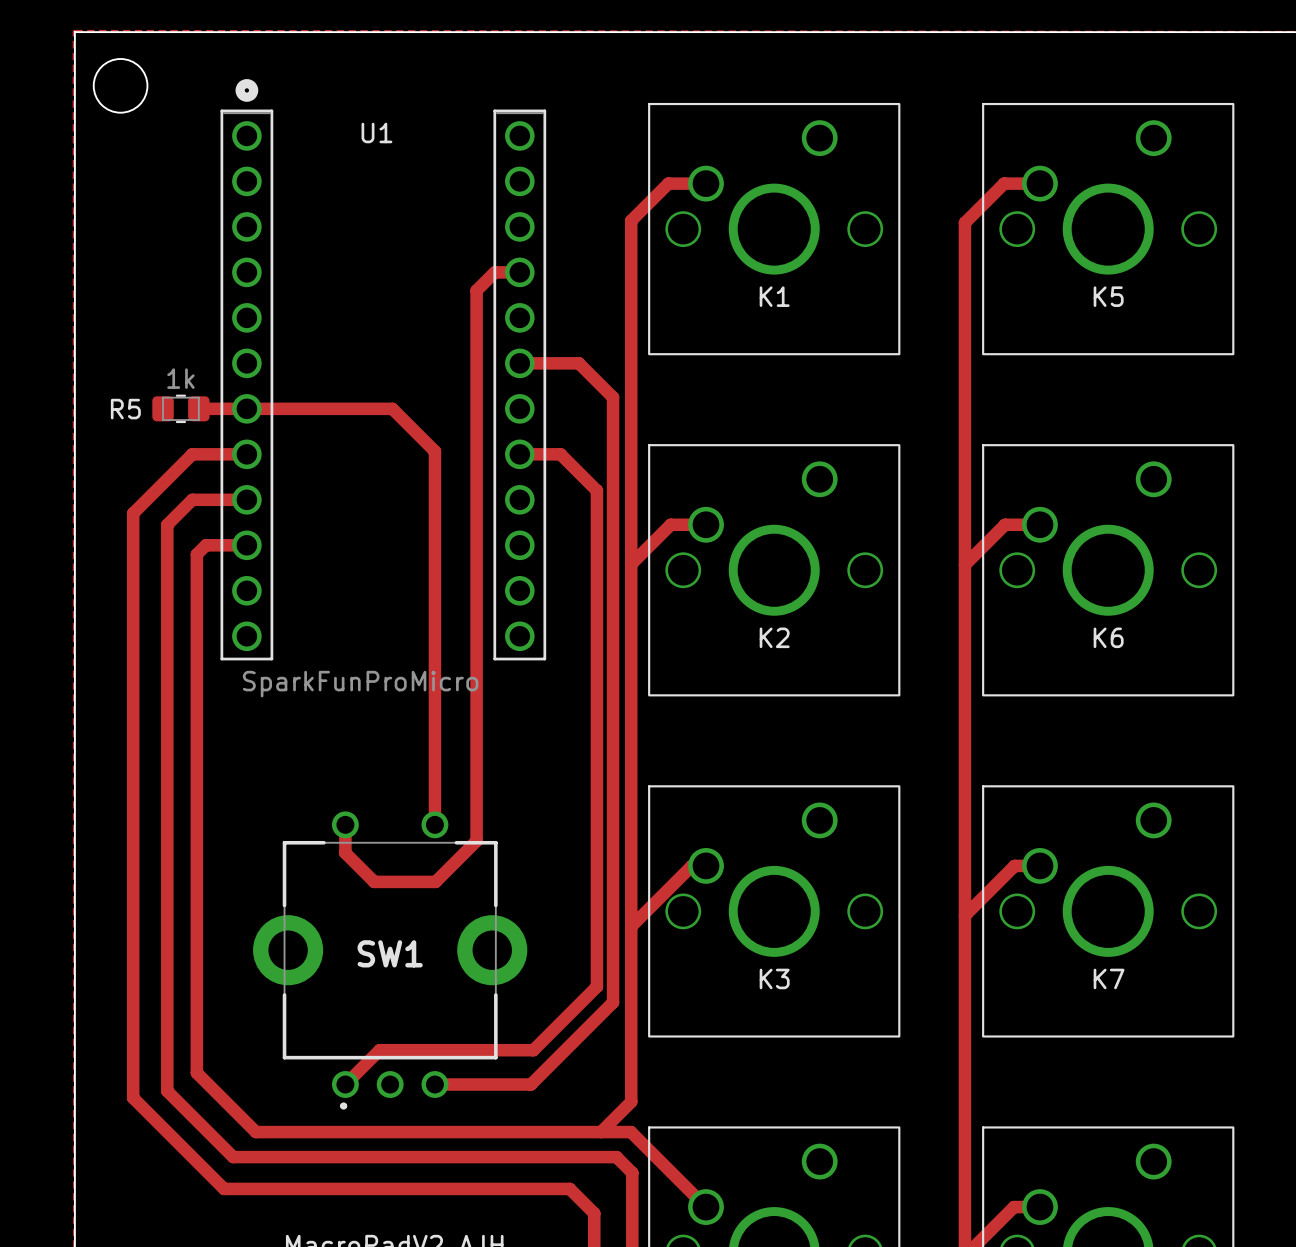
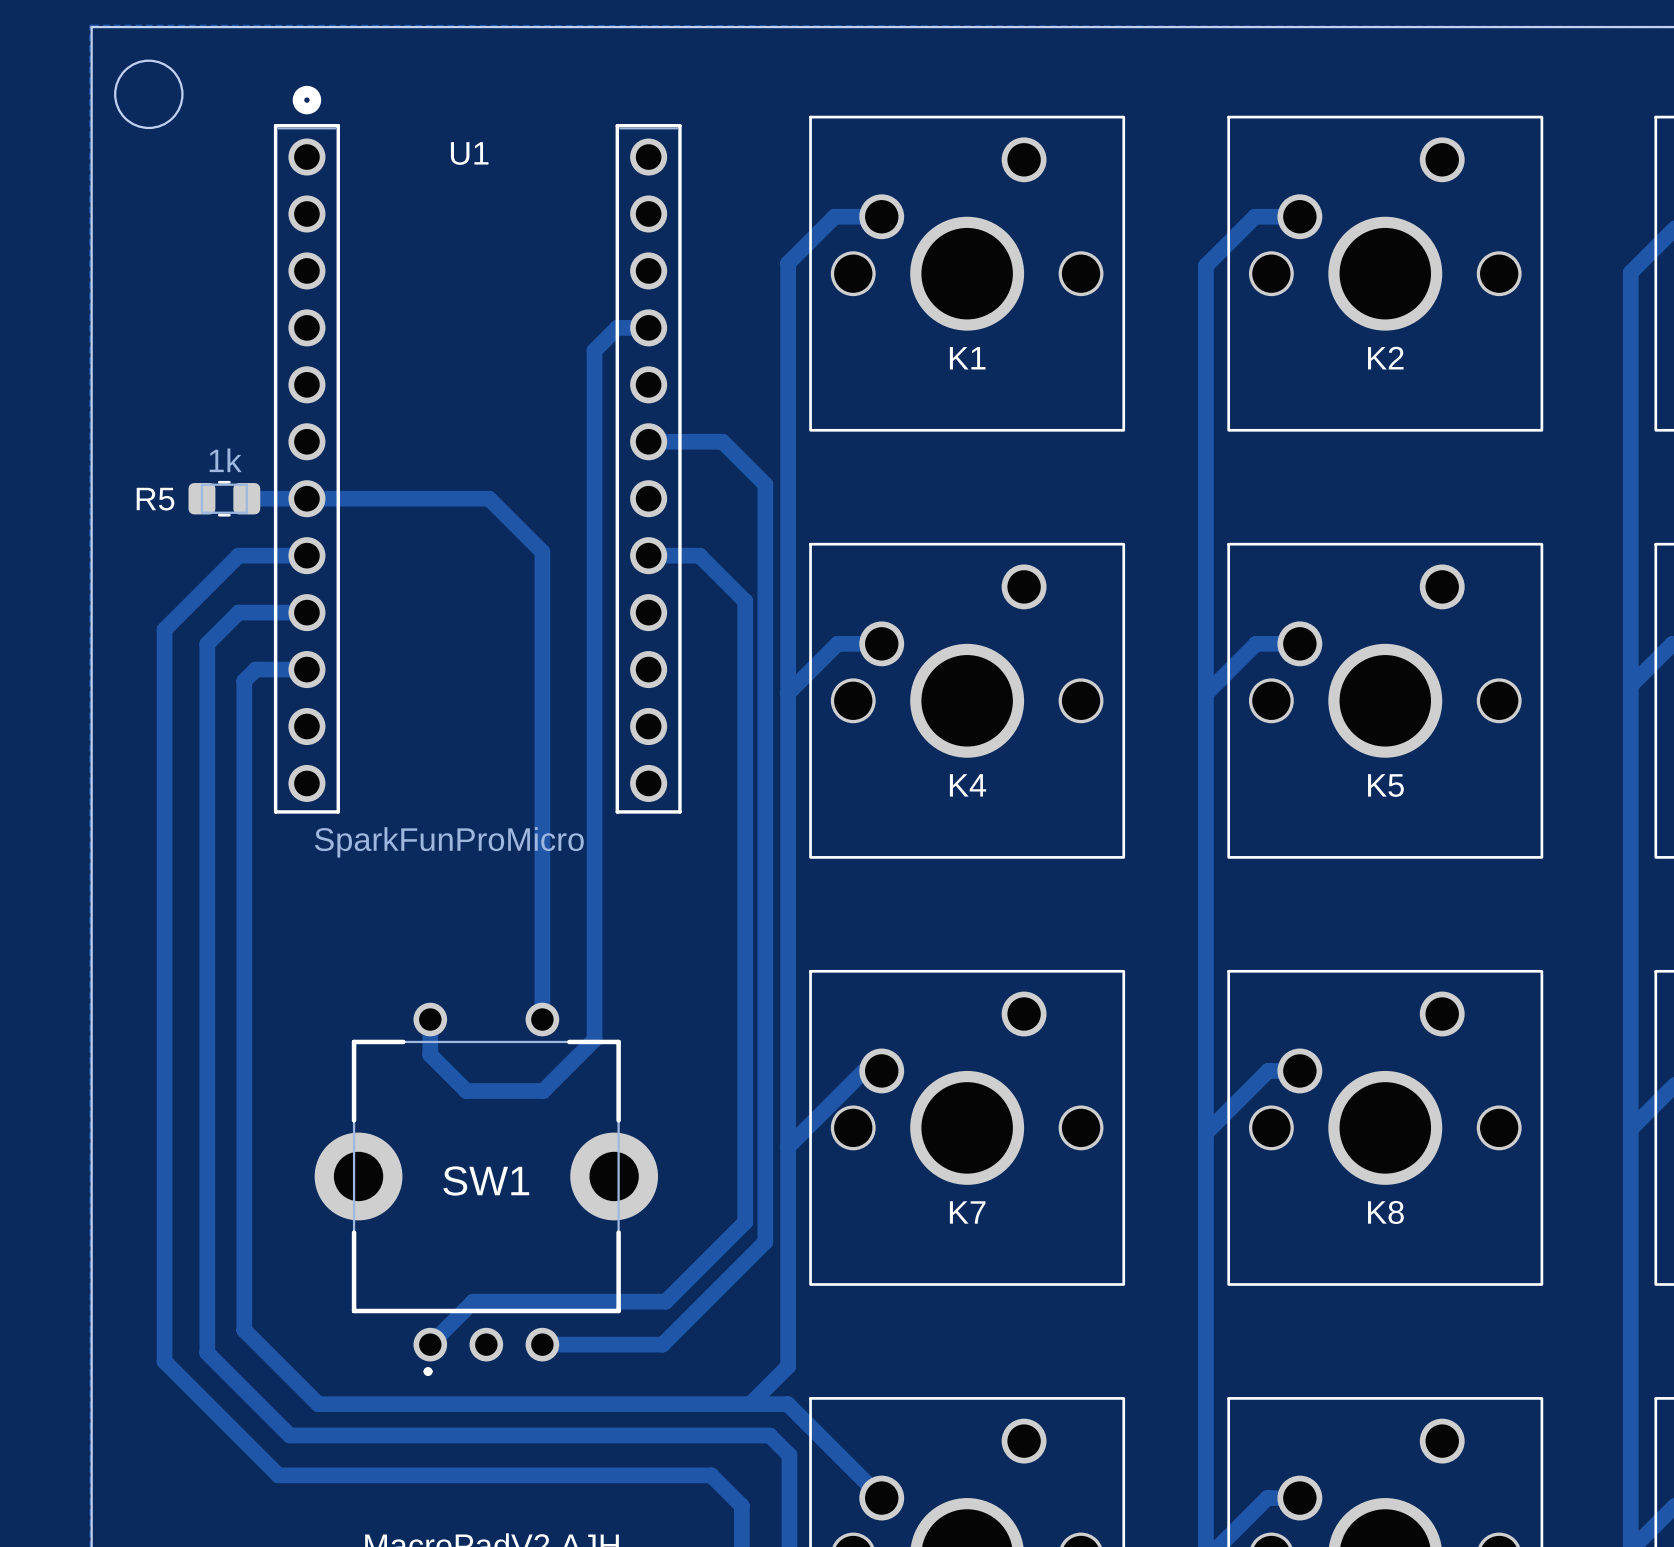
K5 name: K5 (1108, 296) -> K2 (1385, 358)
K2 name: K2 (774, 637) -> K4 (968, 785)
K6 name: K6 (1108, 637) -> K5 (1385, 785)
K3 name: K3 (774, 978) -> K7 (967, 1212)
K7 name: K7 (1109, 978) -> K8 (1385, 1212)

